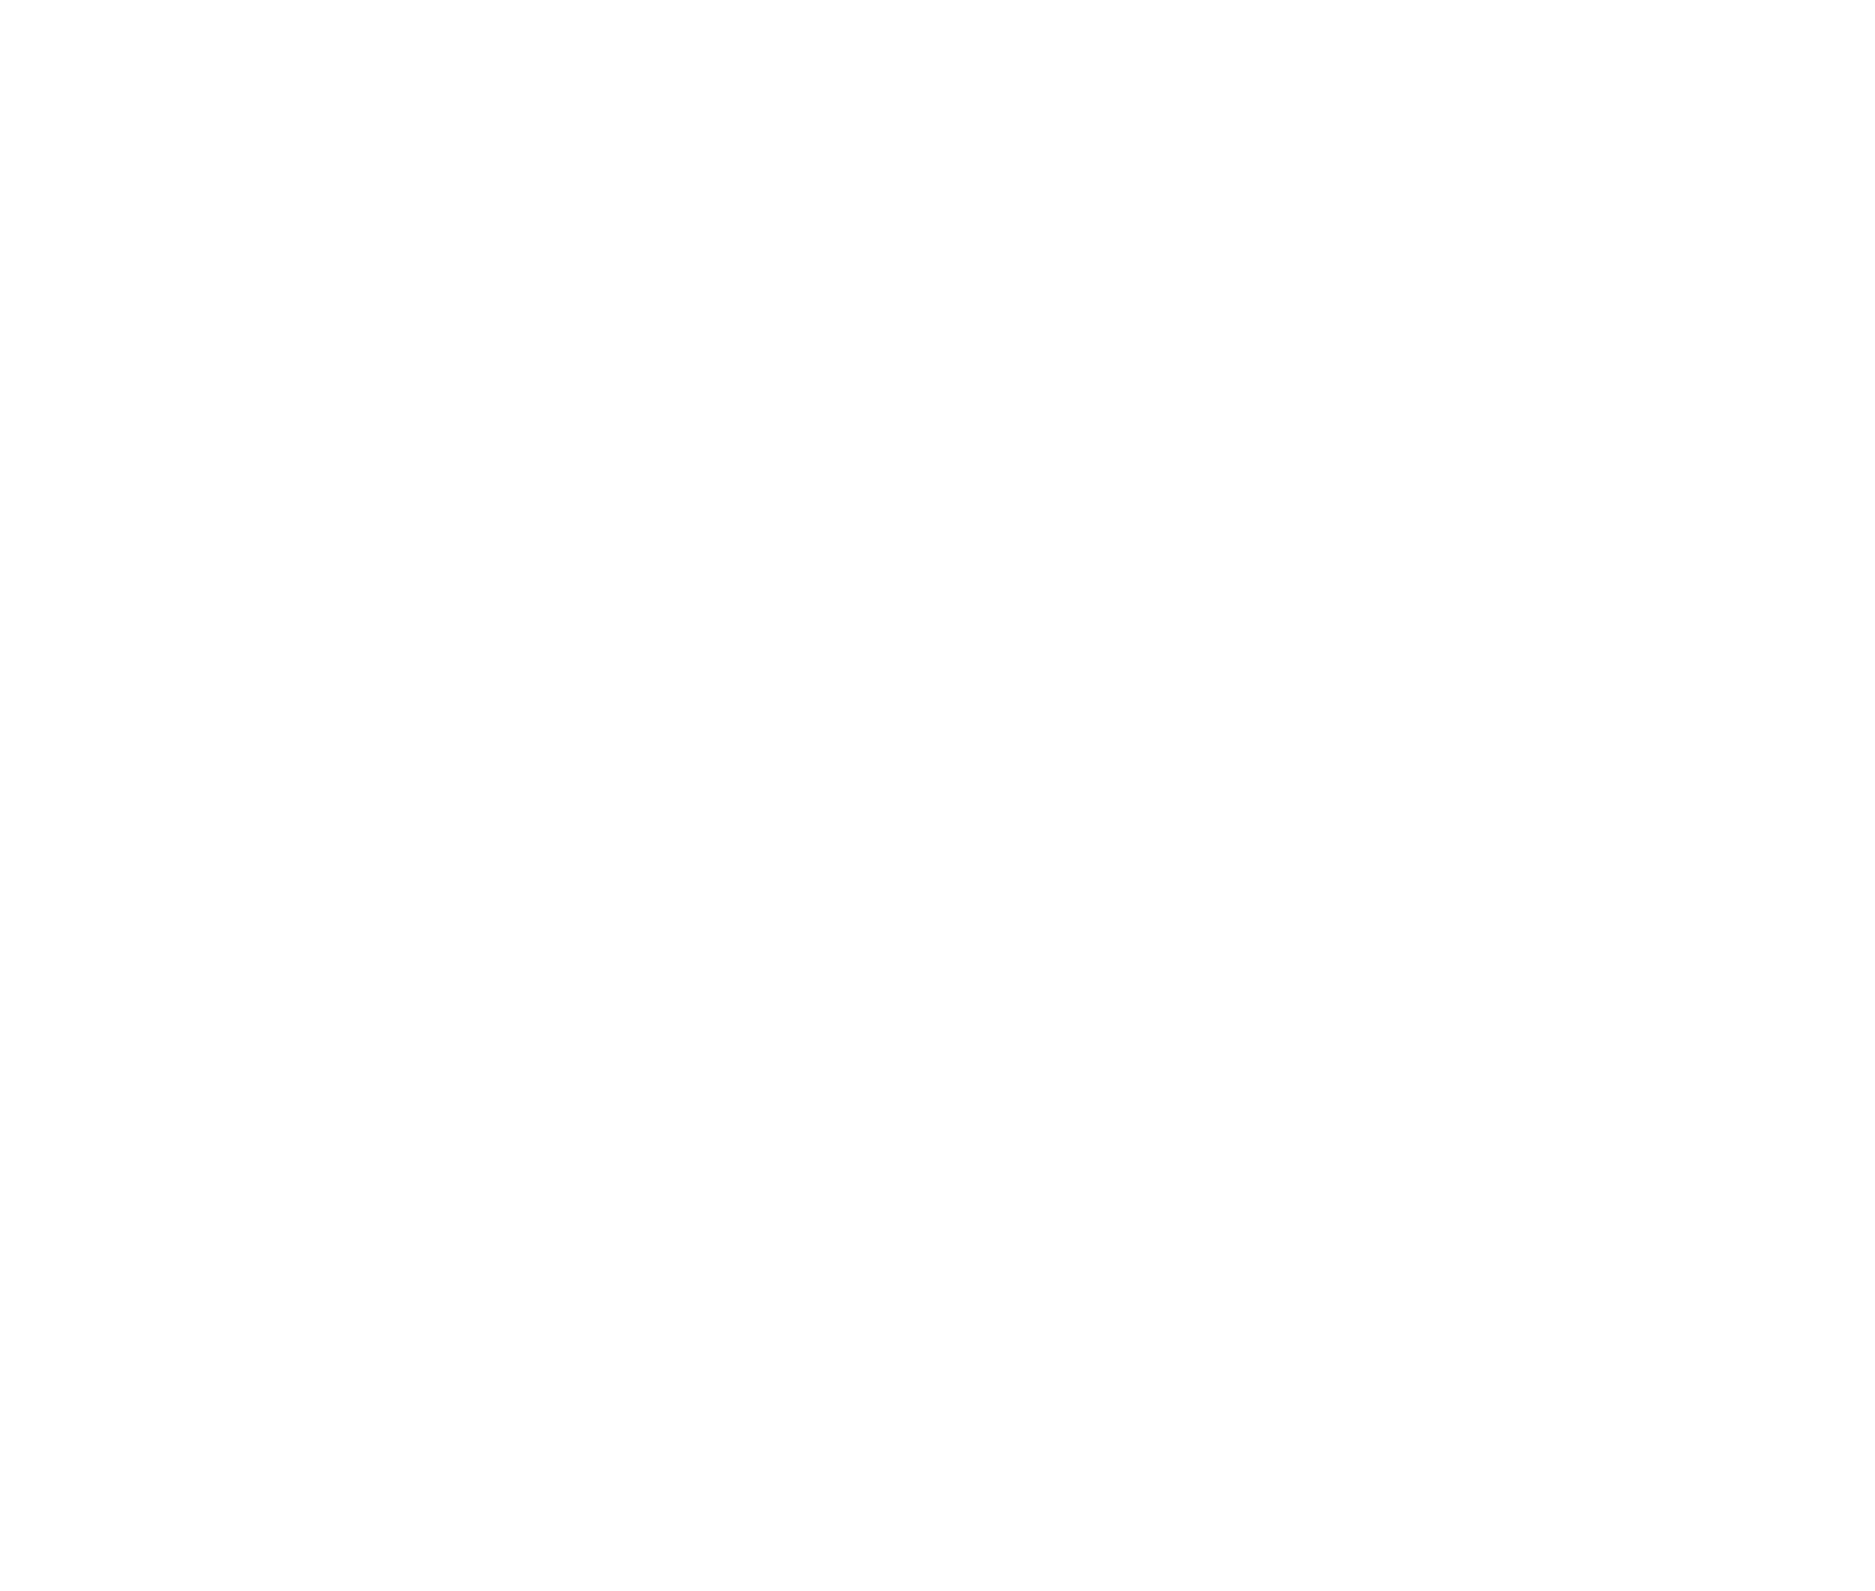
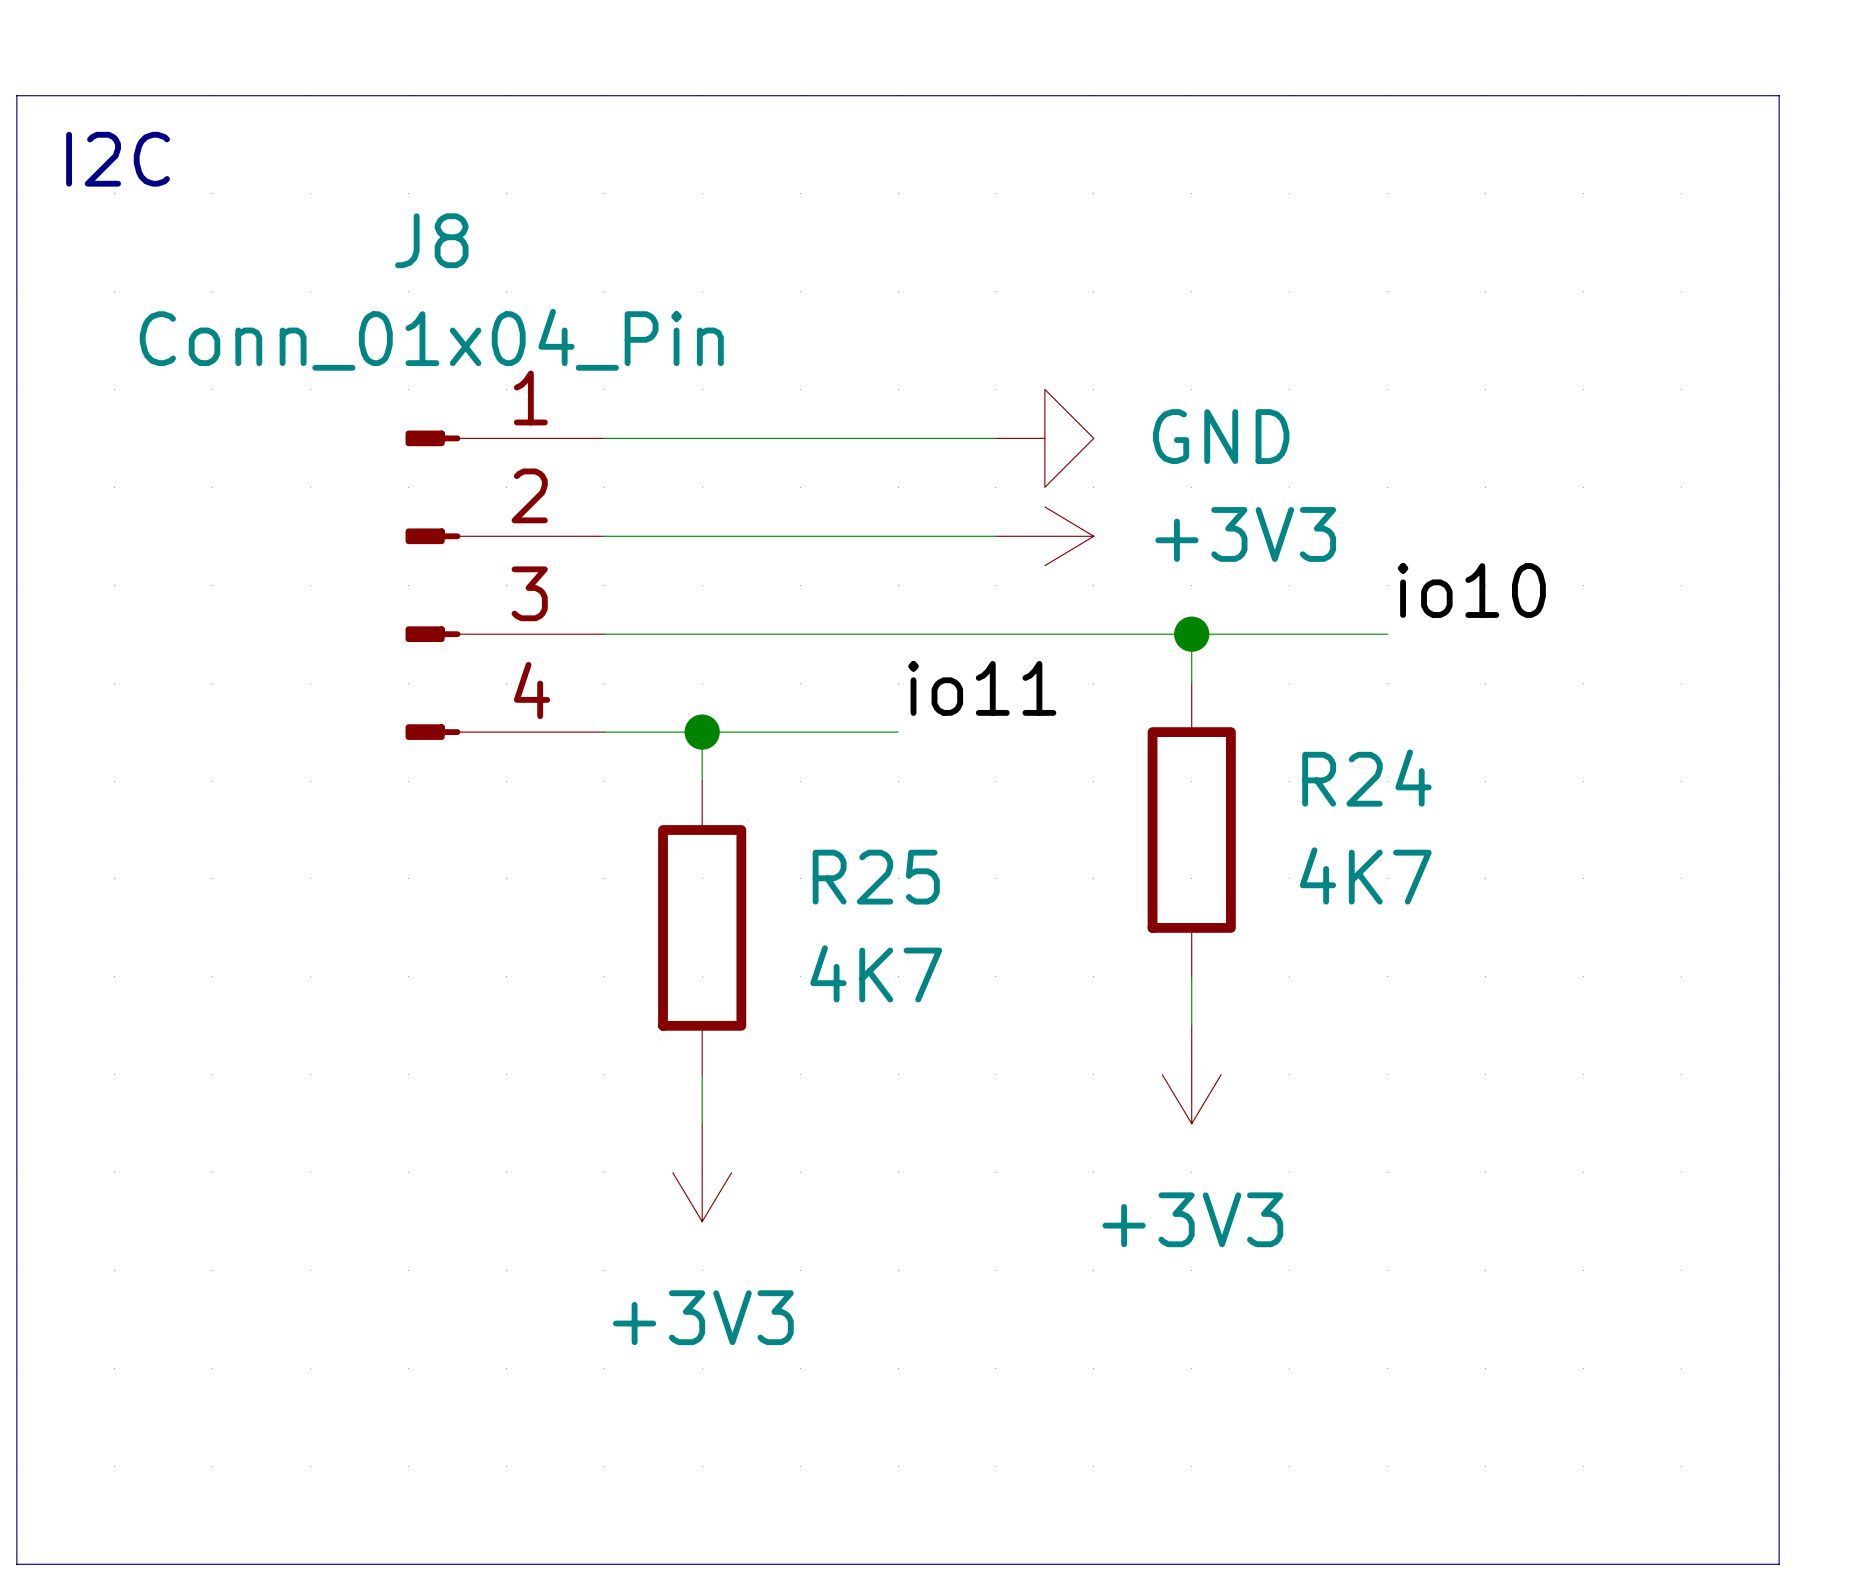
line: none -> (16, 95) (1779, 95) (1779, 1564) (16, 1564) (16, 95)
text: none -> I2C (118, 159)
wire: none -> (604, 438) (995, 438)
power symbol: none -> GND (1044, 438)
wire: none -> (604, 536) (995, 536)
power symbol: none -> +3V3 (1044, 536)
J8: none -> Conn_01x04_Pin (504, 585)
label: none -> io10 (1471, 590)
wire: none -> (604, 634) (1387, 634)
wire: none -> (1191, 634) (1191, 683)
junction: none -> (1191, 634)
label: none -> io11 (982, 688)
wire: none -> (604, 732) (898, 732)
wire: none -> (702, 732) (702, 781)
junction: none -> (702, 732)
R24: none -> 4K7 (1191, 830)
R25: none -> 4K7 (702, 927)
wire: none -> (1191, 976) (1191, 1025)
wire: none -> (702, 1074) (702, 1123)
power symbol: none -> +3V3 (1191, 1074)
power symbol: none -> +3V3 (702, 1172)

